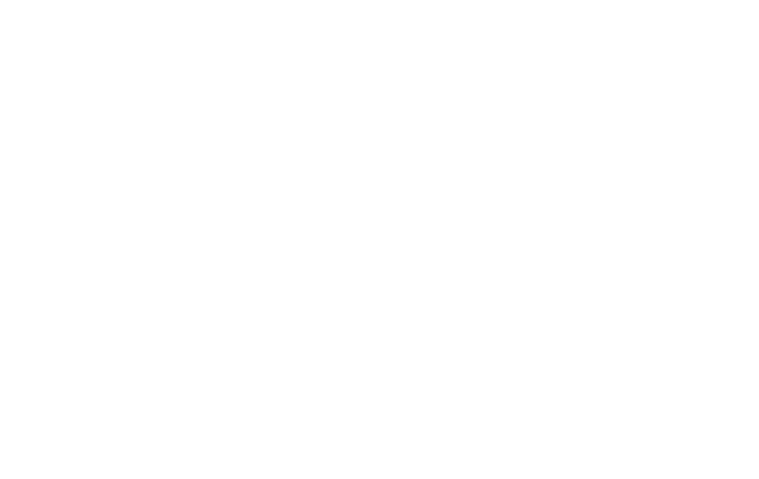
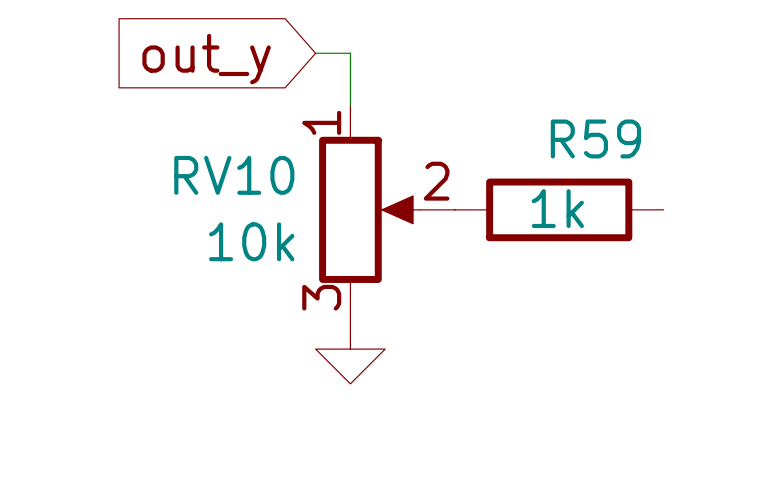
wire: none -> (315, 53) (350, 53) (350, 105)
global label: none -> out_y (206, 59)
RV10: none -> 10k (386, 209)
R59: none -> 1k (559, 209)
power symbol: none -> (350, 349)

